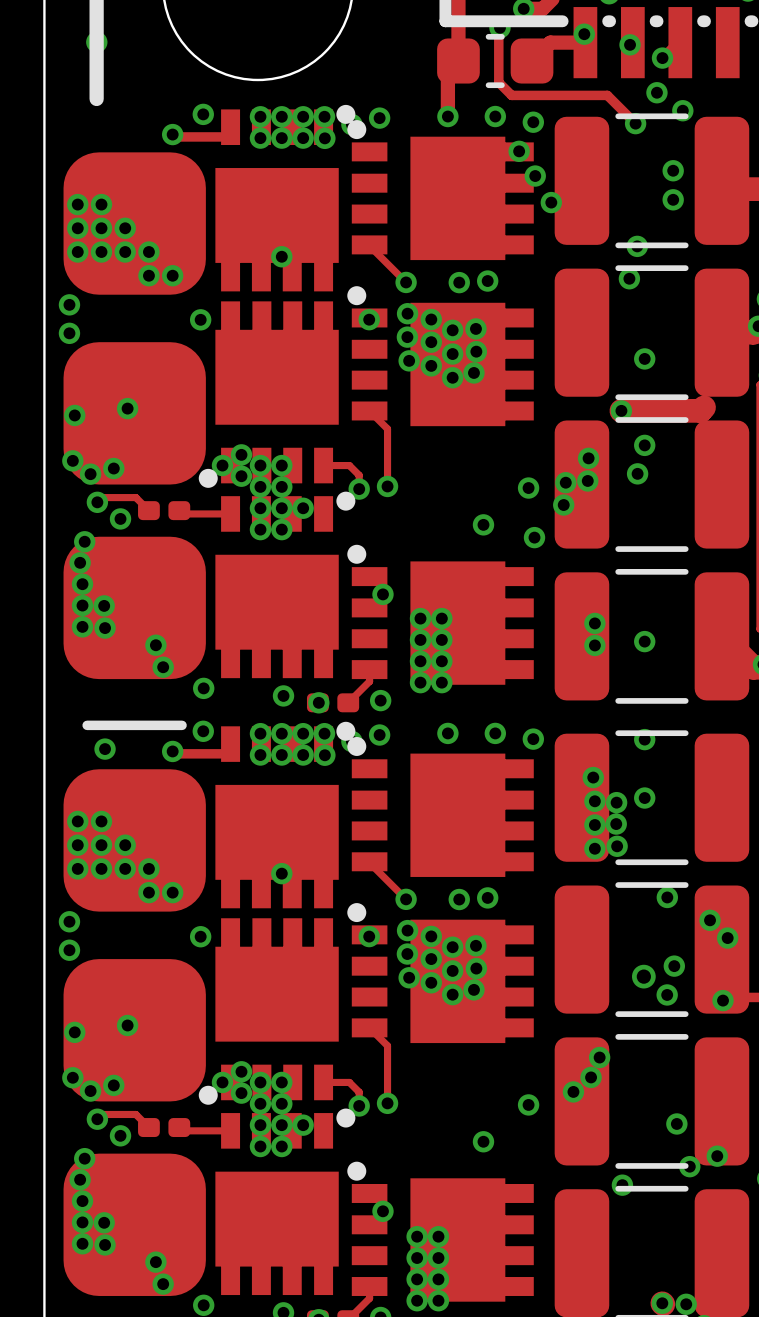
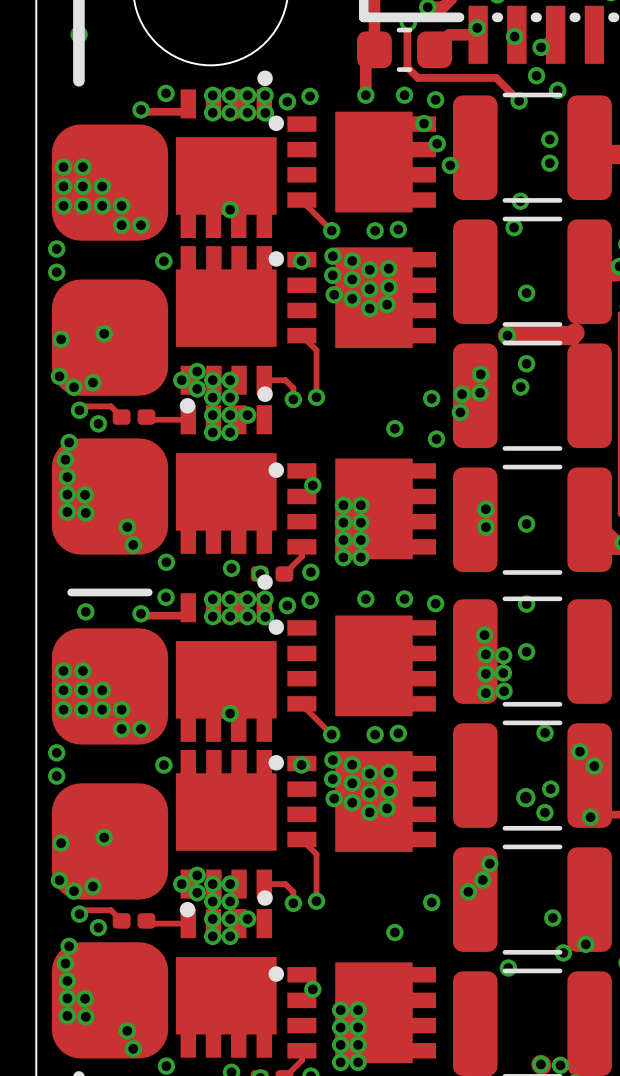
part footprint: [215, 104, 356, 292] -> [175, 70, 277, 239]
part footprint: [347, 120, 534, 261] -> [268, 111, 436, 213]
part footprint: [347, 286, 534, 427] -> [268, 247, 436, 349]
part footprint: [198, 301, 339, 488] -> [175, 246, 277, 414]
part footprint: [215, 491, 356, 679] -> [175, 386, 277, 554]
part footprint: [347, 544, 534, 685] -> [268, 458, 436, 560]
part footprint: [215, 721, 356, 909] -> [175, 574, 277, 742]
part footprint: [347, 736, 534, 877] -> [268, 615, 436, 717]
part footprint: [347, 903, 534, 1044] -> [268, 751, 436, 852]
part footprint: [198, 918, 339, 1105] -> [175, 750, 277, 918]
part footprint: [215, 1108, 356, 1296] -> [175, 890, 277, 1058]
part footprint: [347, 1161, 534, 1302] -> [268, 962, 436, 1064]

